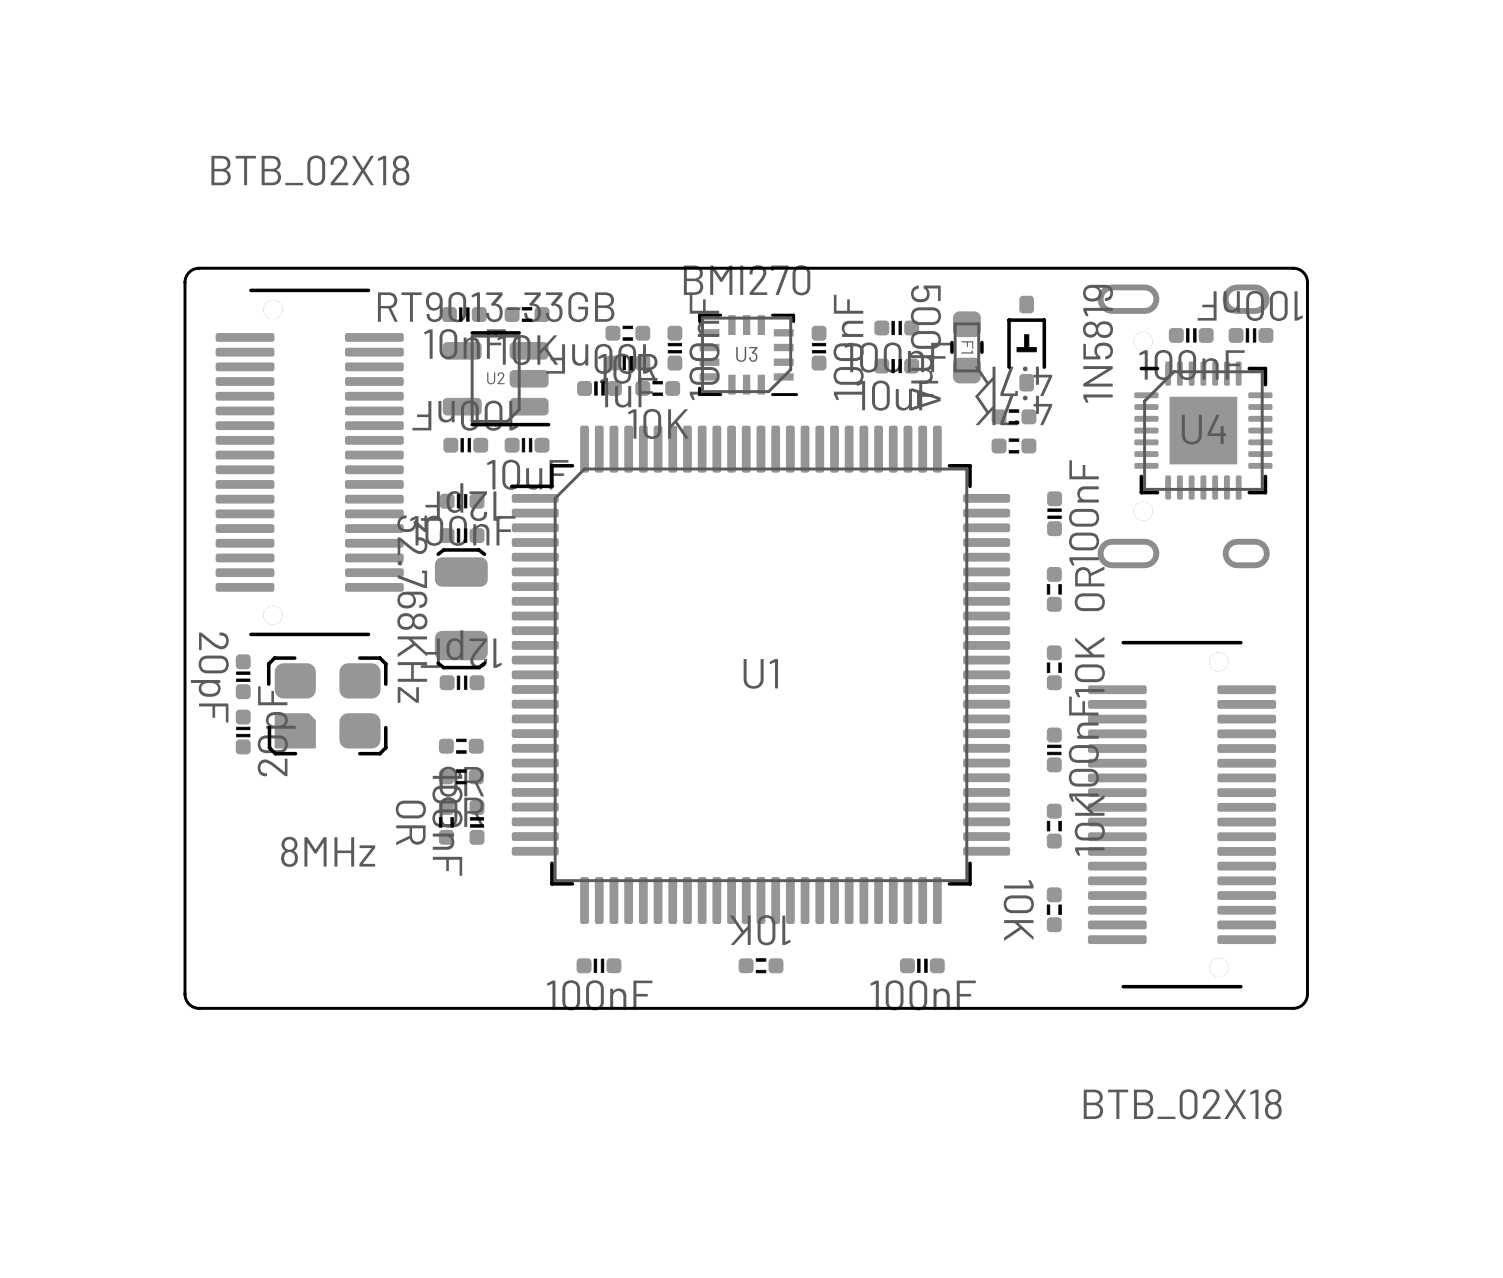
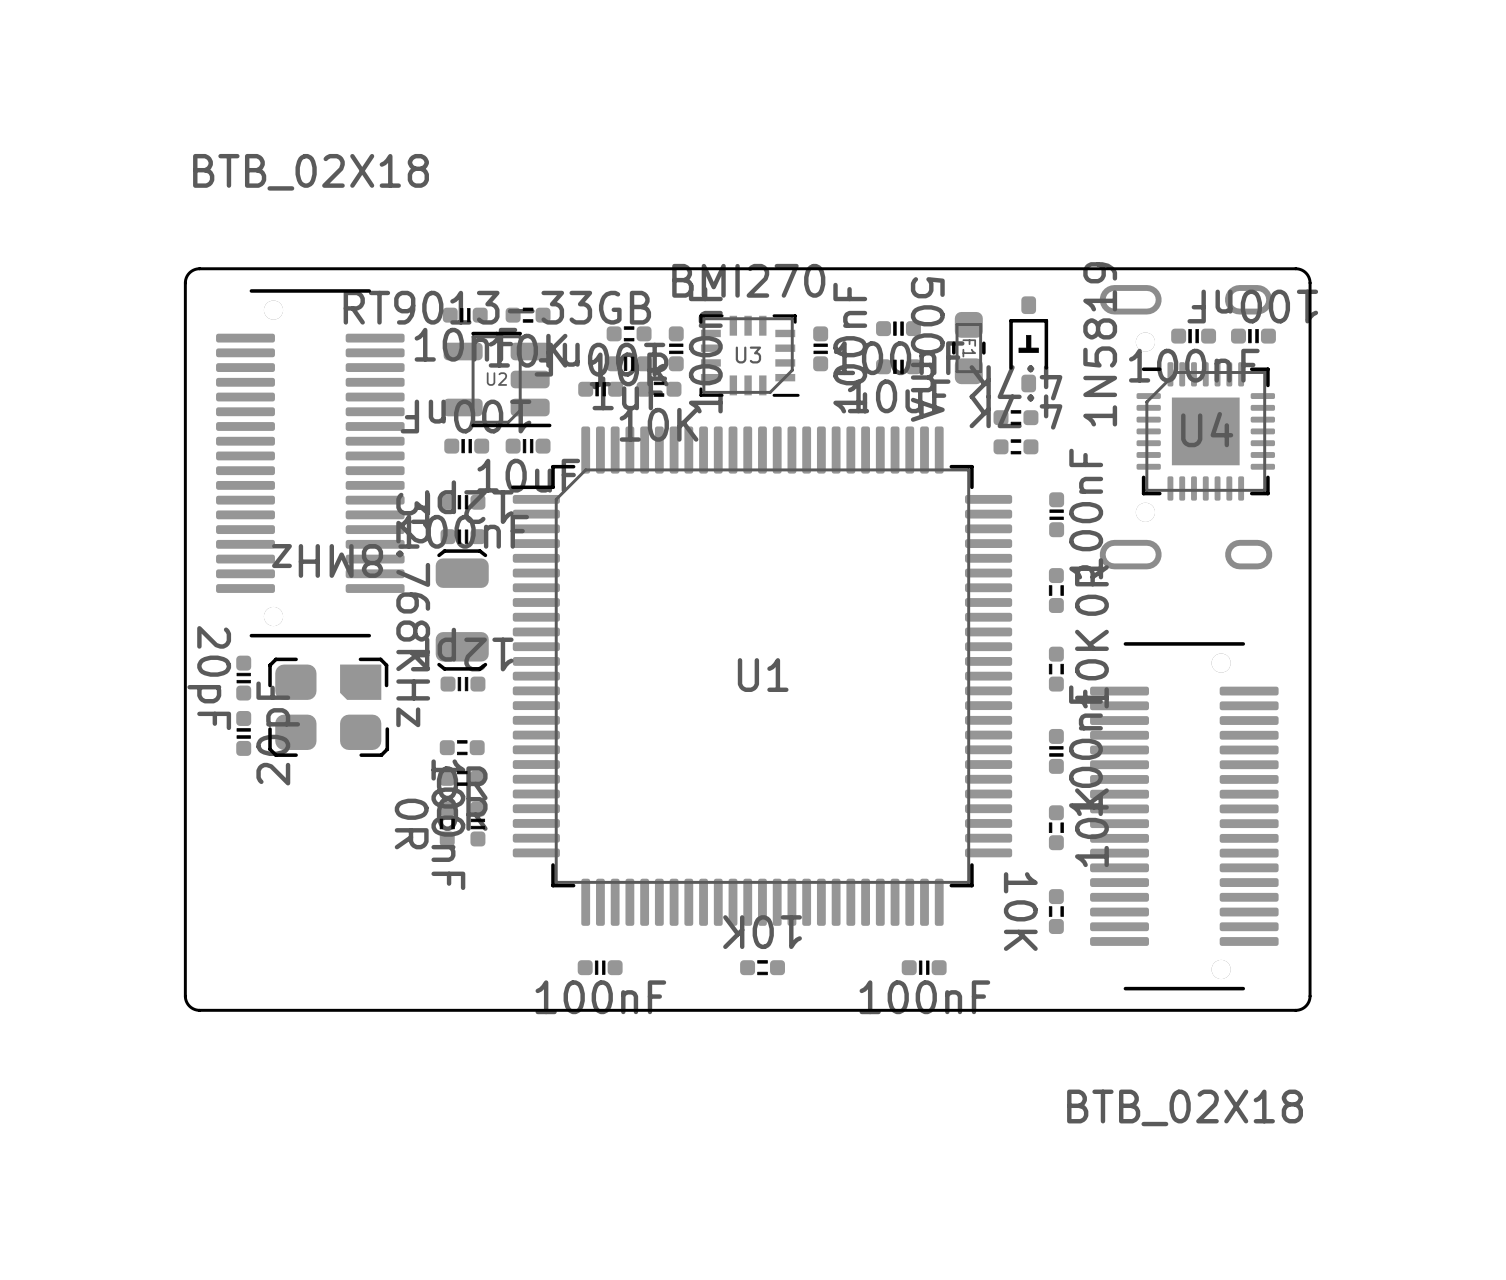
part rotation: 0° (327, 705) -> 180° (328, 707)

